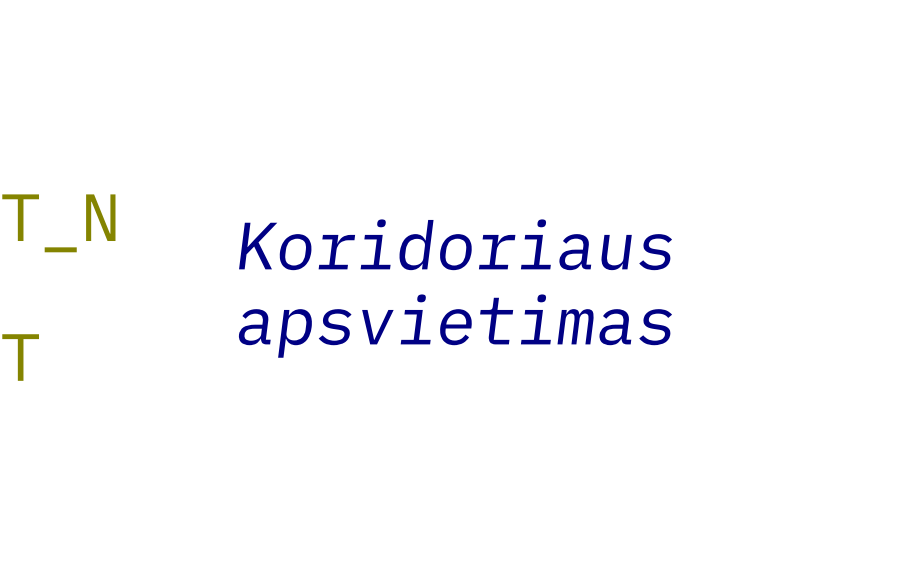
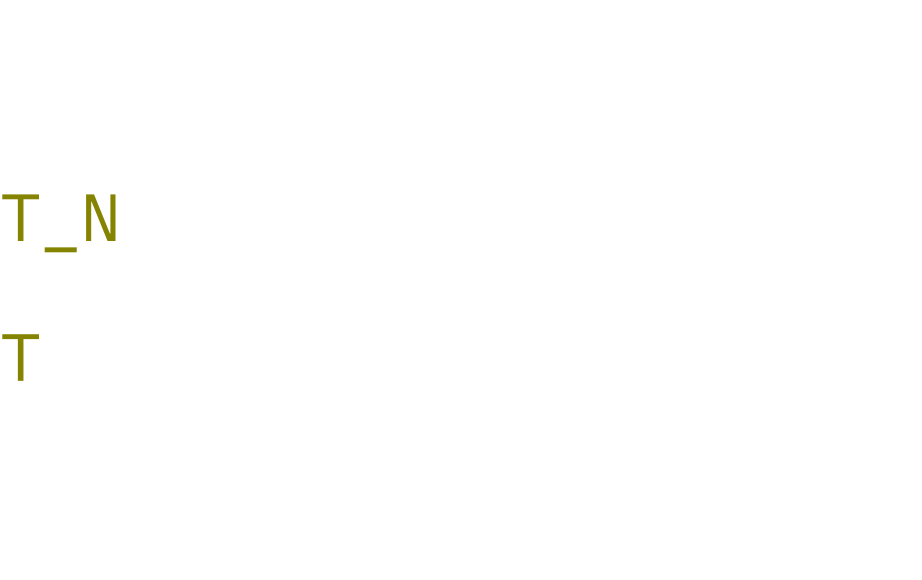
text: Koridoriaus (455, 244) -> none
text: apsvietimas (455, 326) -> none

